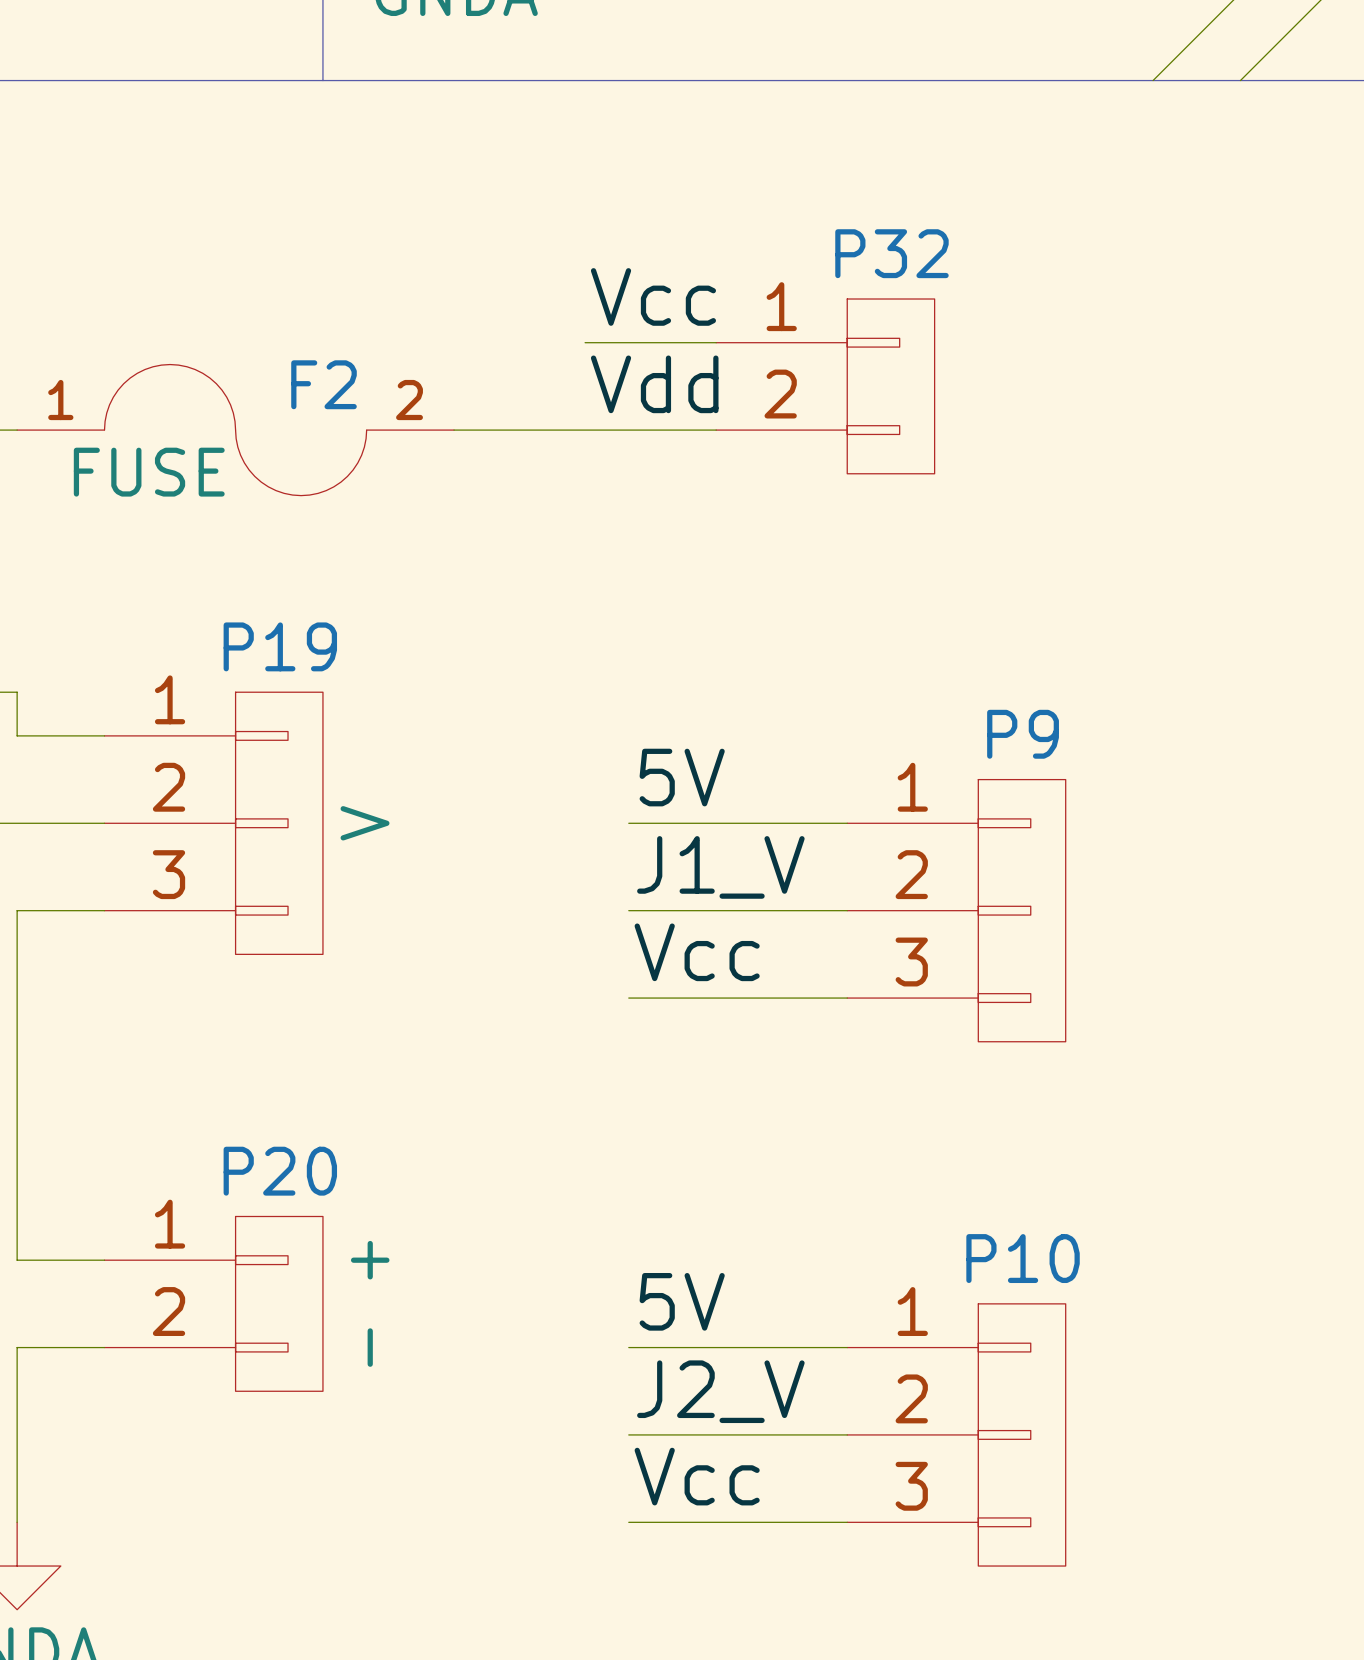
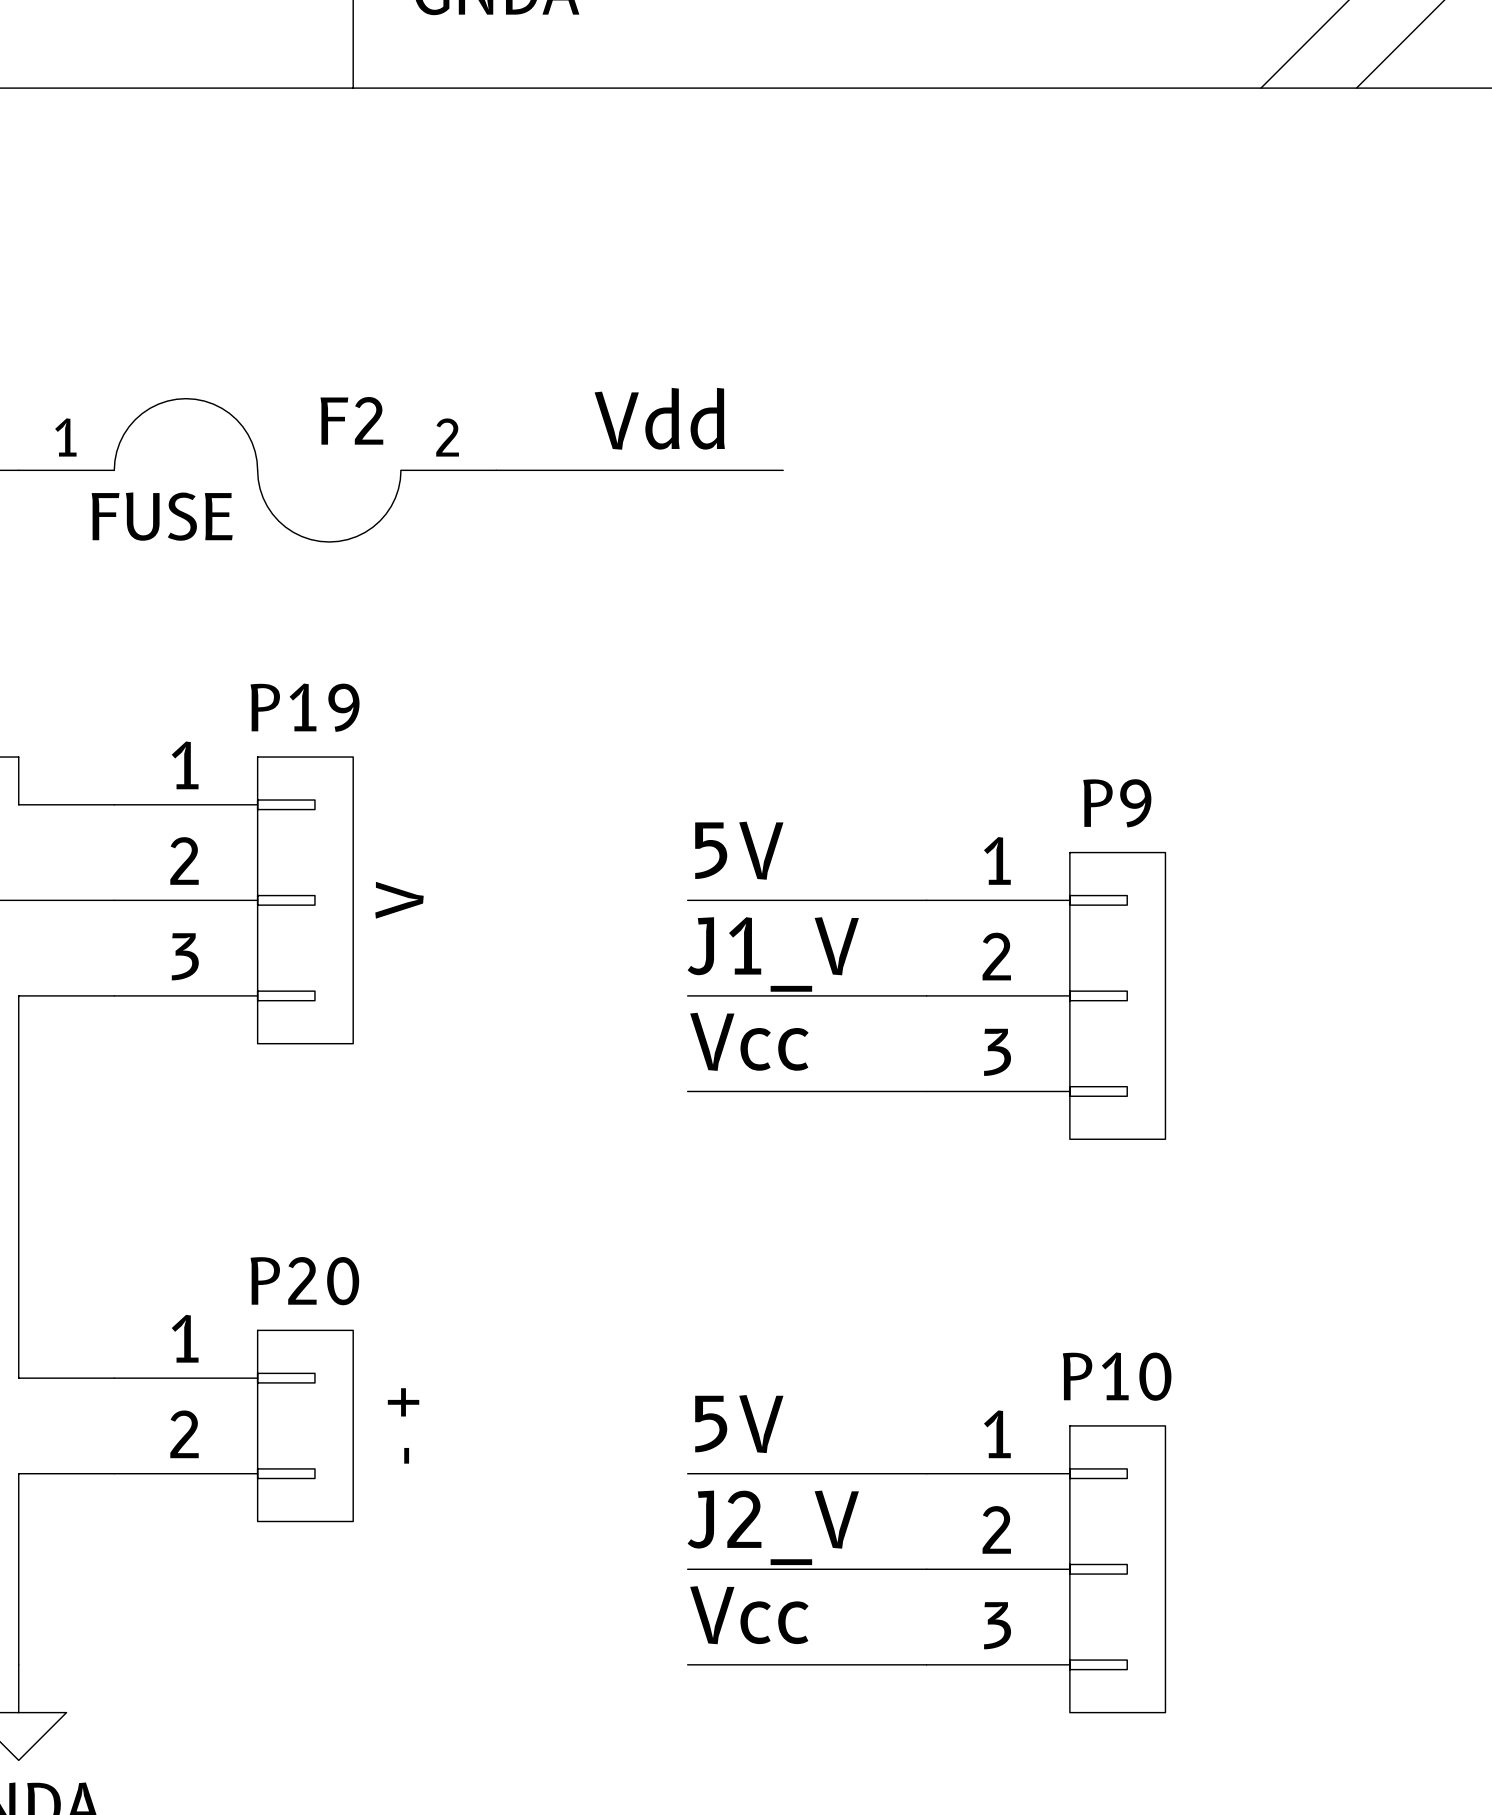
label: Vcc (653, 296) -> none
wire: (585, 342) (716, 342) -> none
label position: Vdd (654, 384) -> Vdd (659, 418)
P32: (825, 386) -> none

